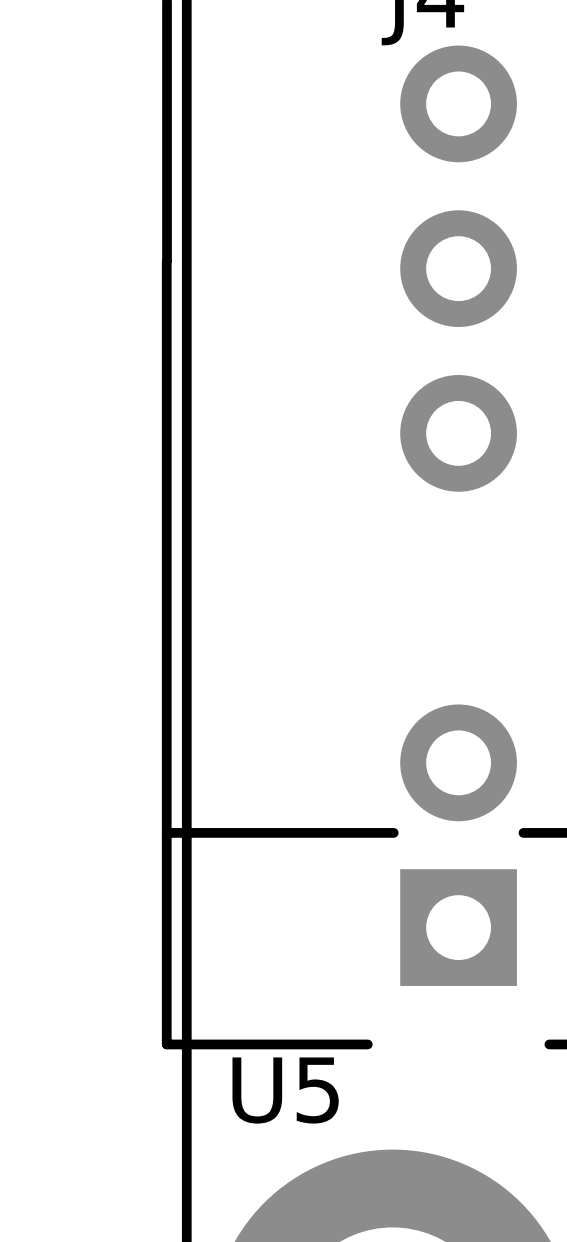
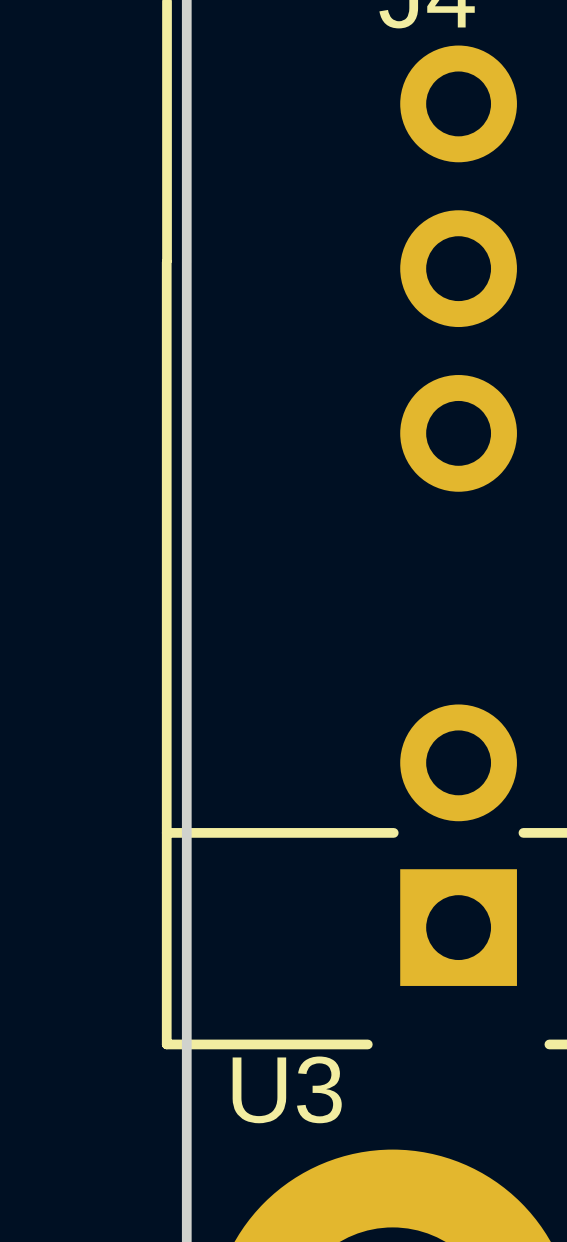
U5 name: U5 (285, 1090) -> U3 (287, 1089)

